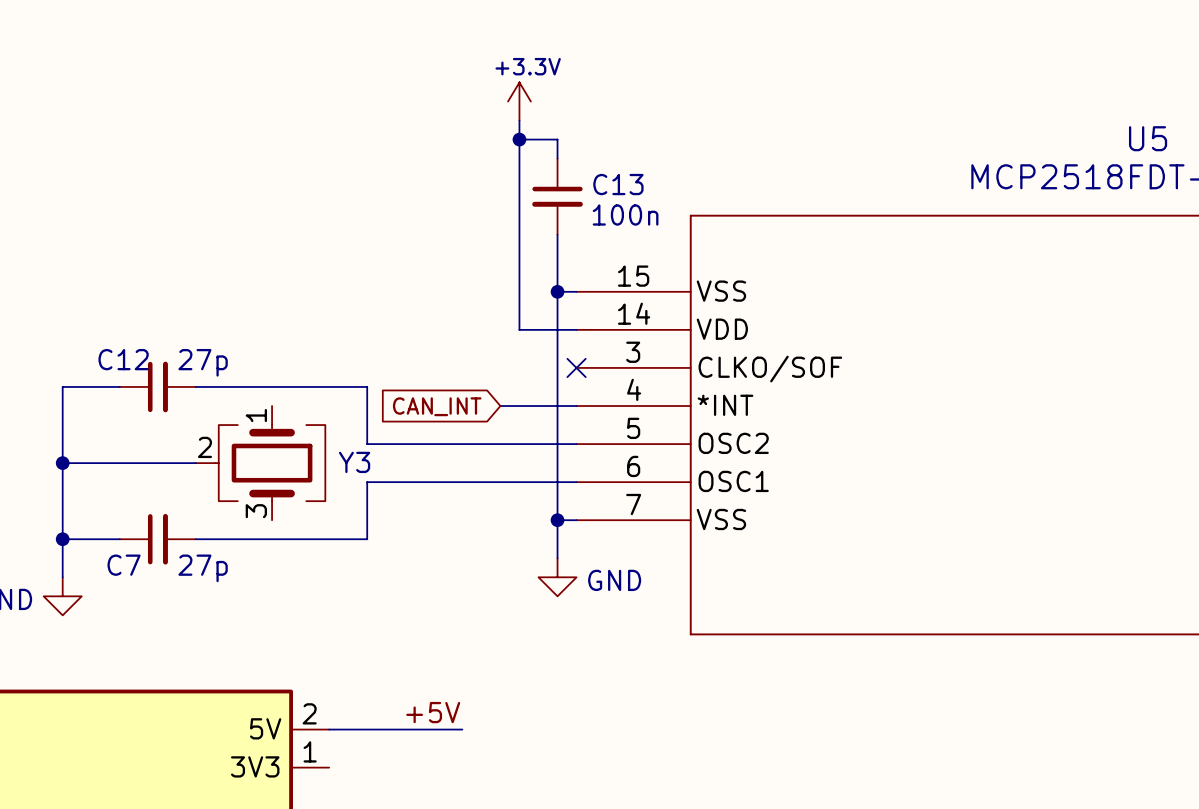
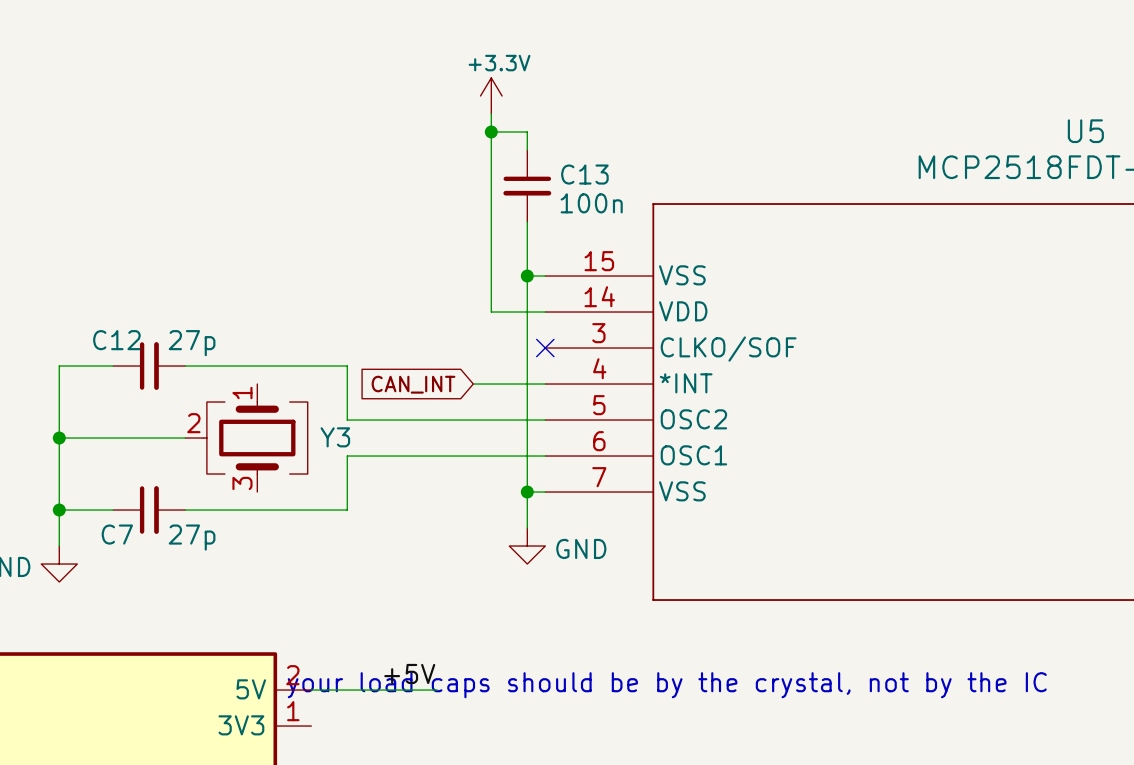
text: none -> your load caps should be by the crystal, not by the IC (667, 685)

